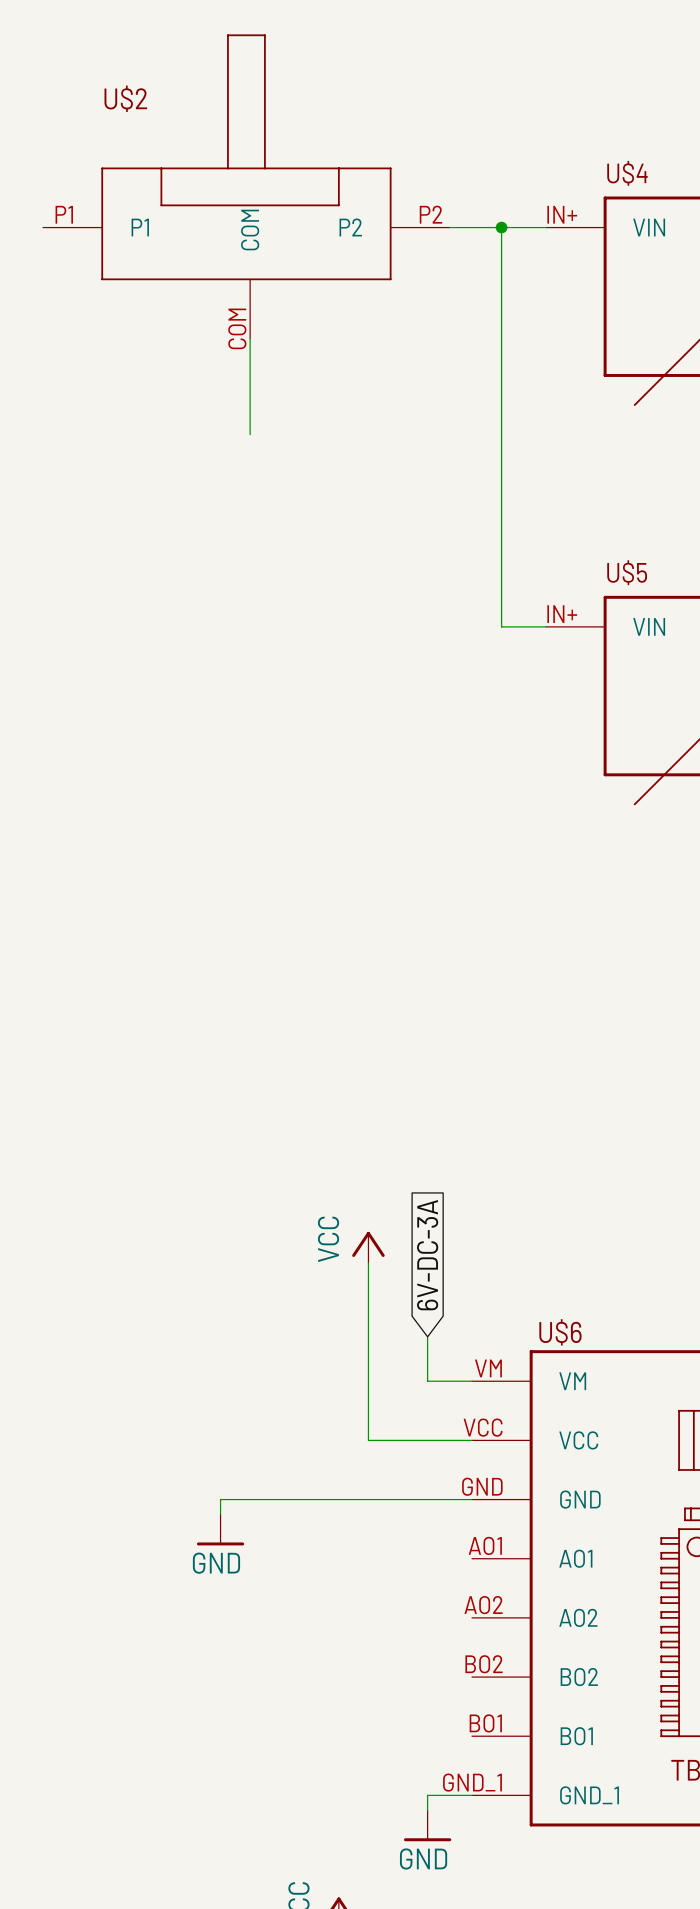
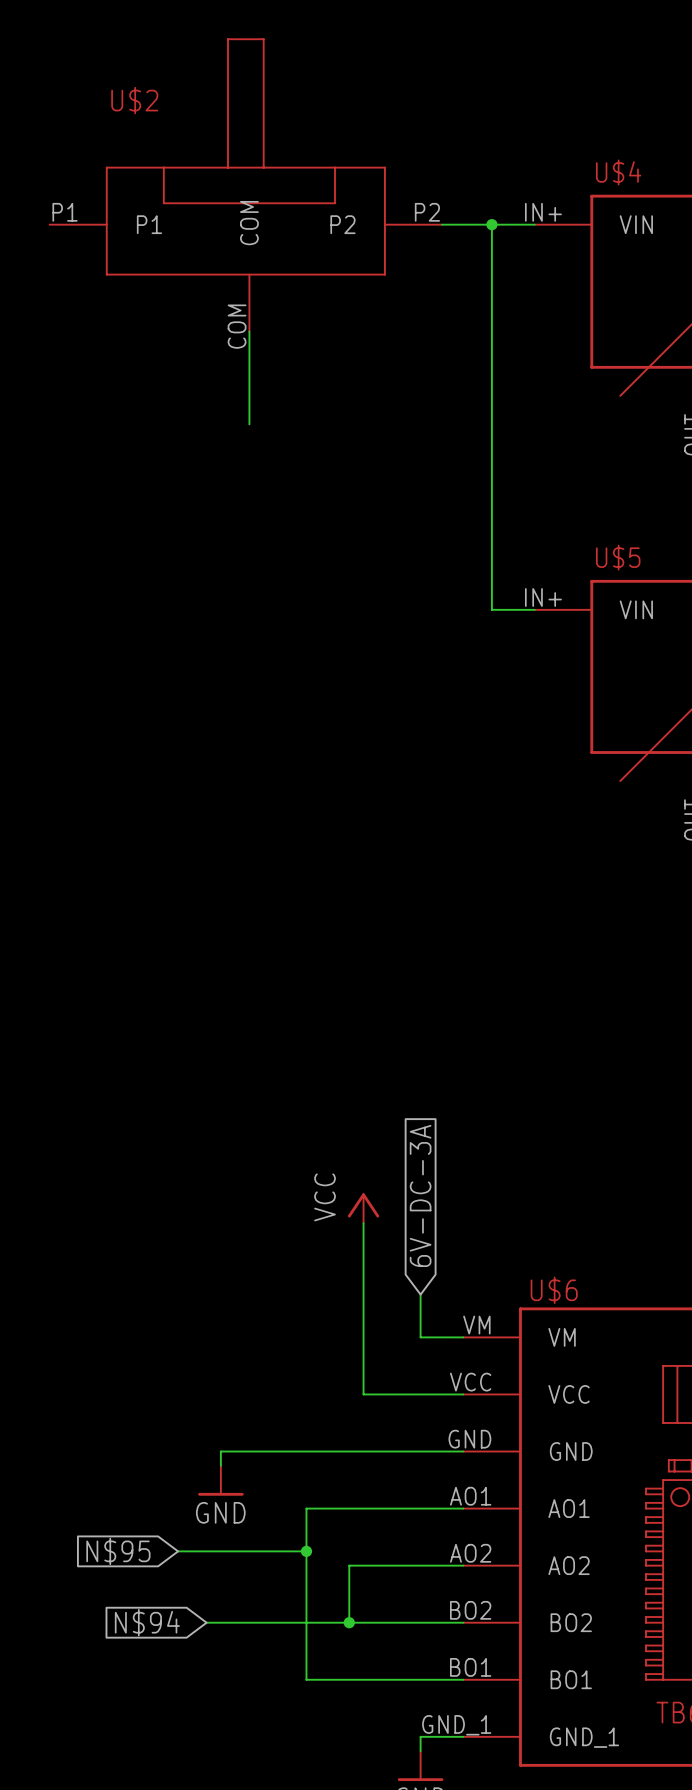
wire: none -> (463, 1508) (306, 1508) (306, 1679) (463, 1679)
global label: none -> N$95 (118, 1551)
wire: none -> (178, 1551) (306, 1551)
junction: none -> (306, 1551)
wire: none -> (463, 1565) (349, 1565) (349, 1622)
global label: none -> N$94 (147, 1622)
wire: none -> (206, 1622) (463, 1622)
junction: none -> (349, 1622)

